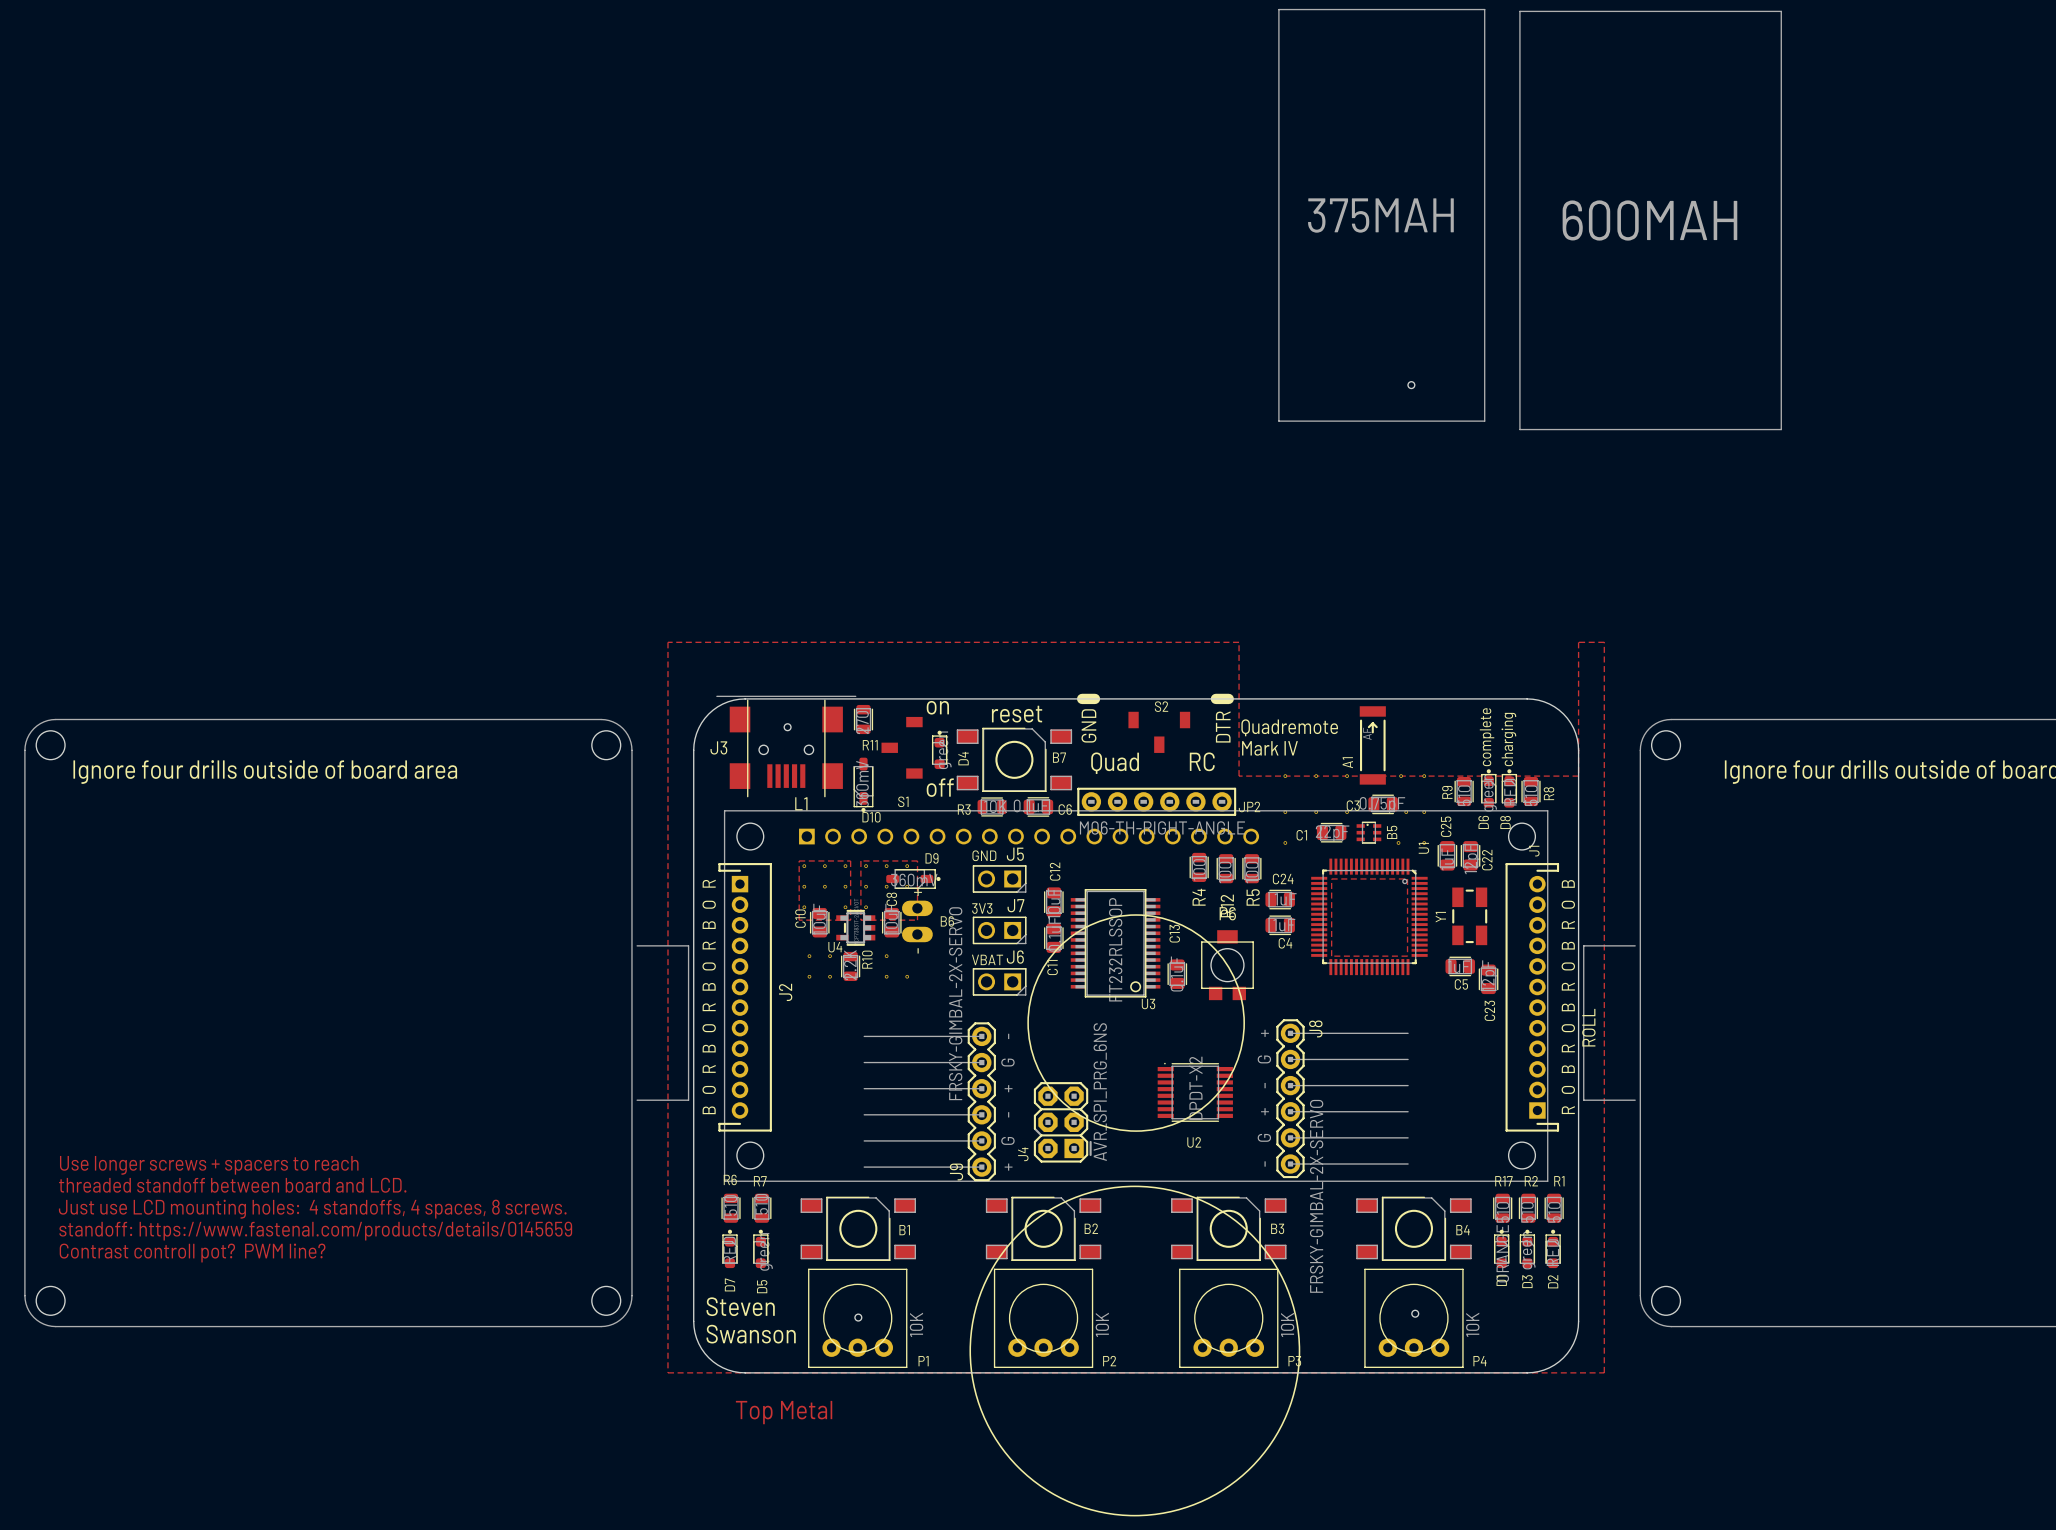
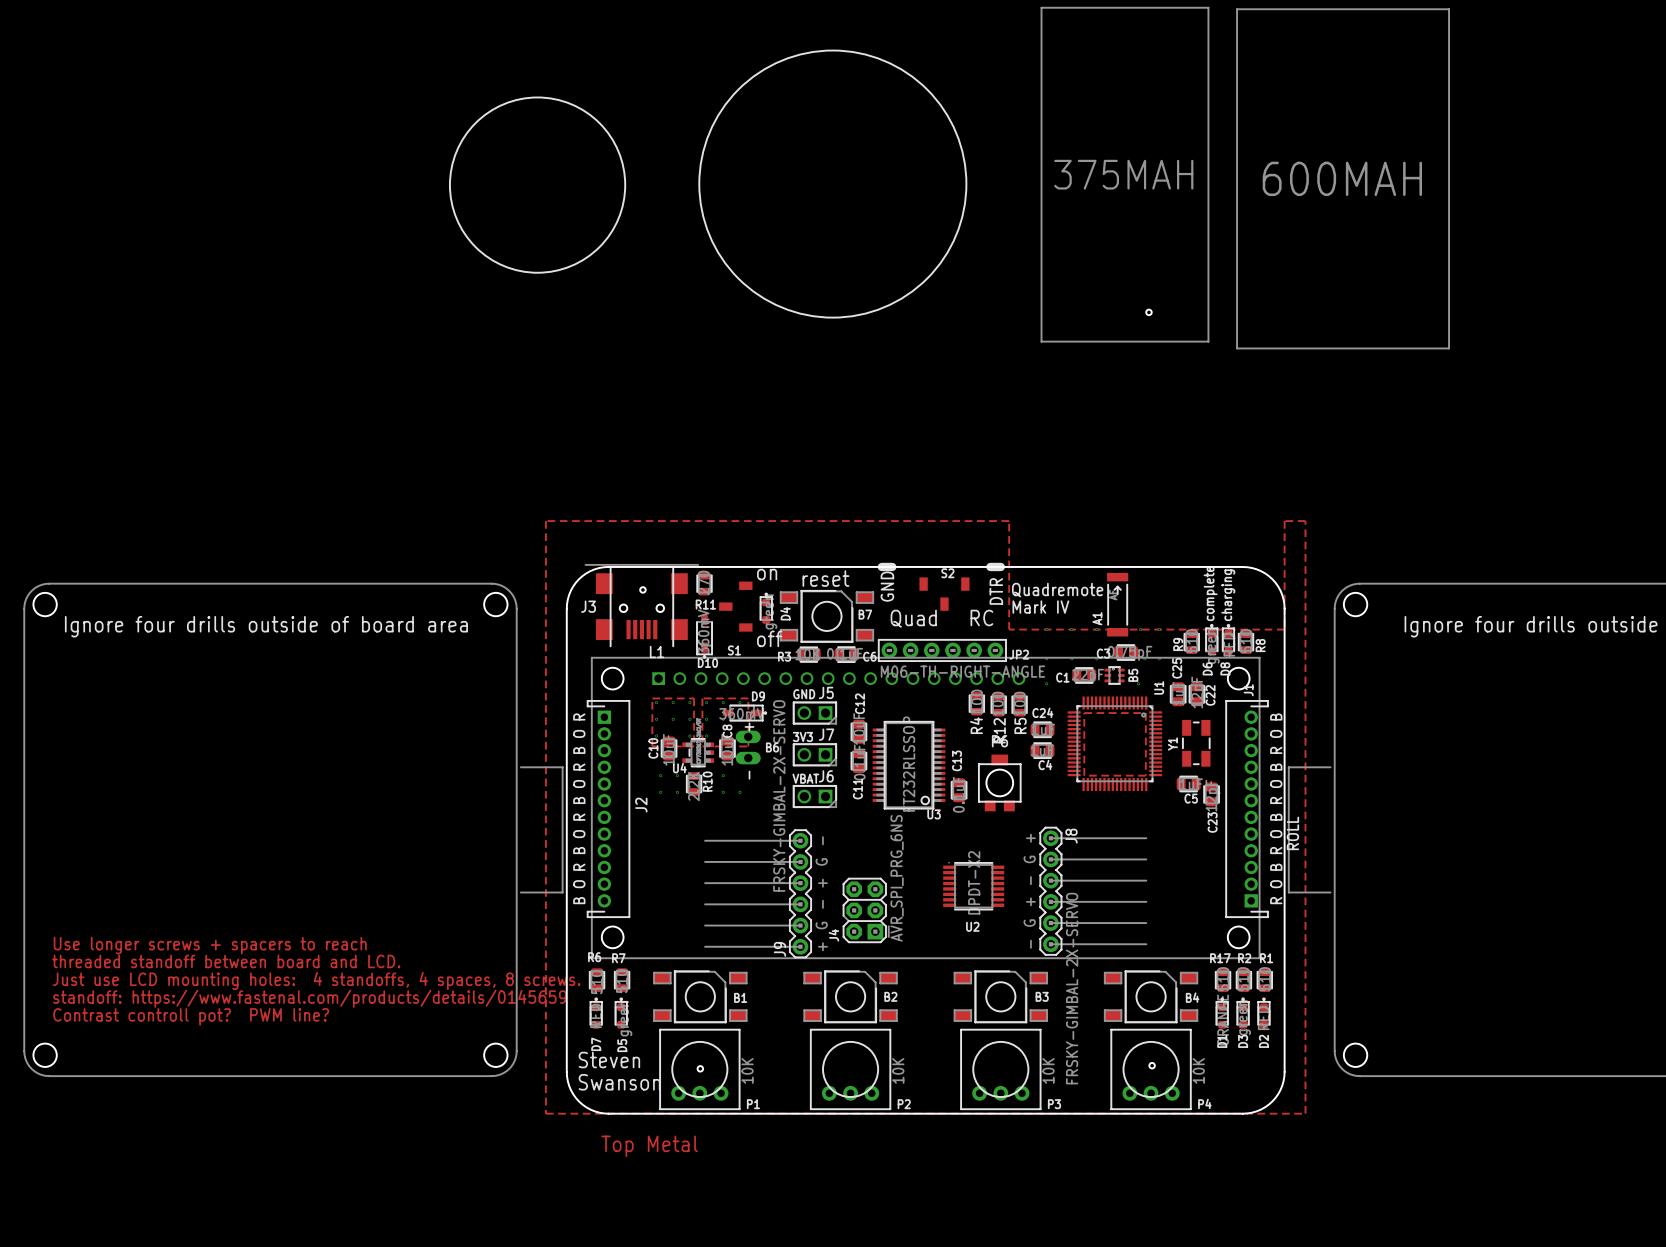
drawing: none -> [698, 49, 968, 319]
drawing: none -> [449, 96, 626, 274]
drawing: [1027, 914, 1245, 1132] -> none
drawing: [969, 1185, 1301, 1517] -> none

